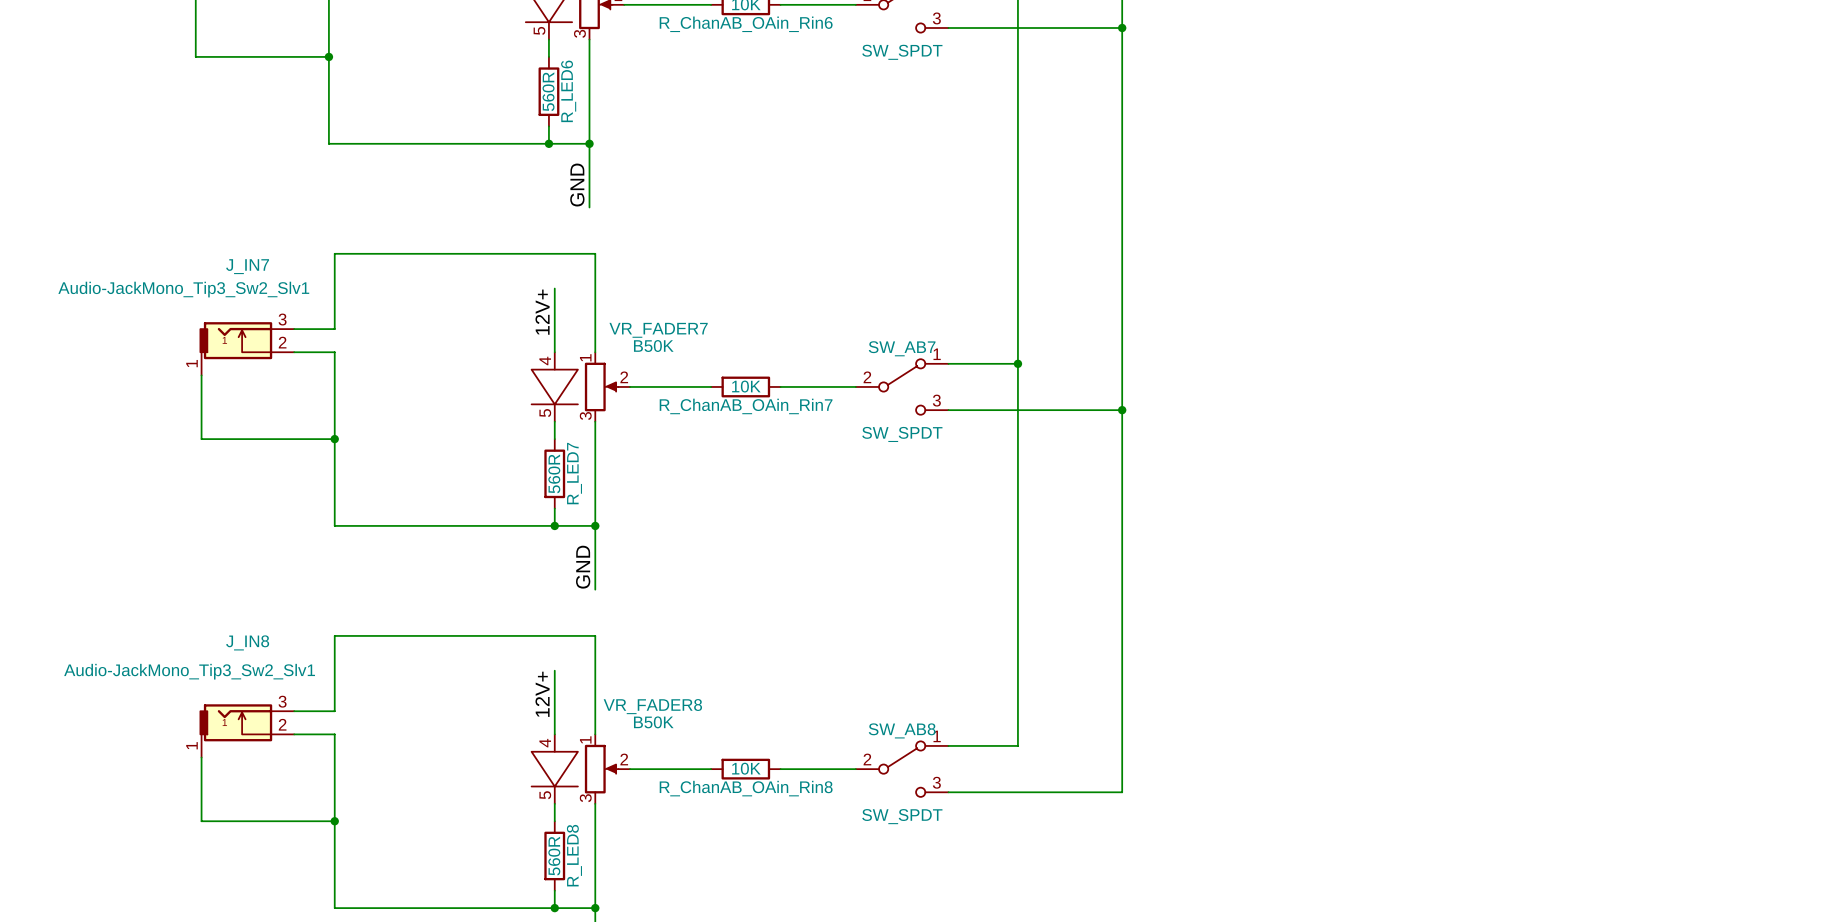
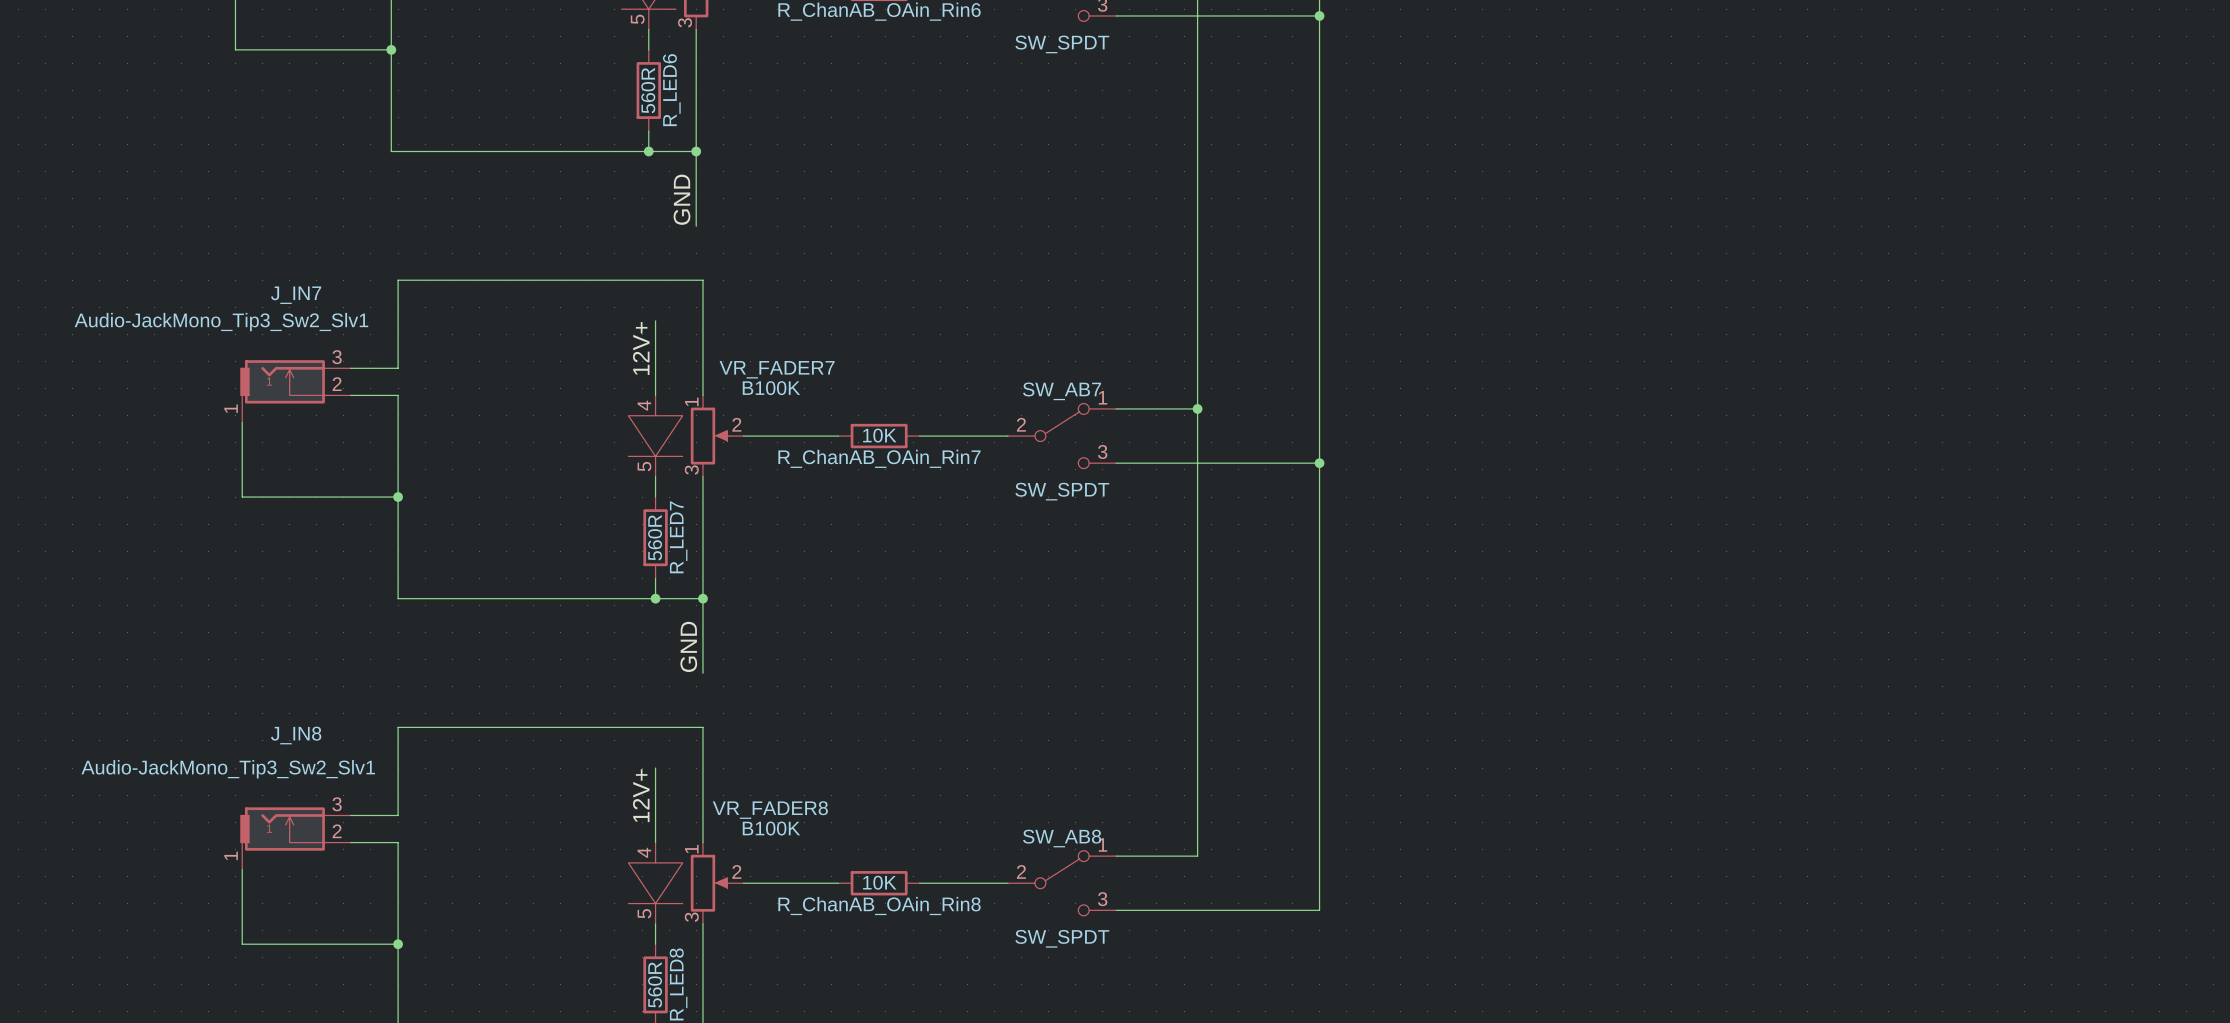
VR_FADER7 value: B50K (653, 346) -> B100K (771, 388)
VR_FADER8 value: B50K (653, 722) -> B100K (771, 828)

